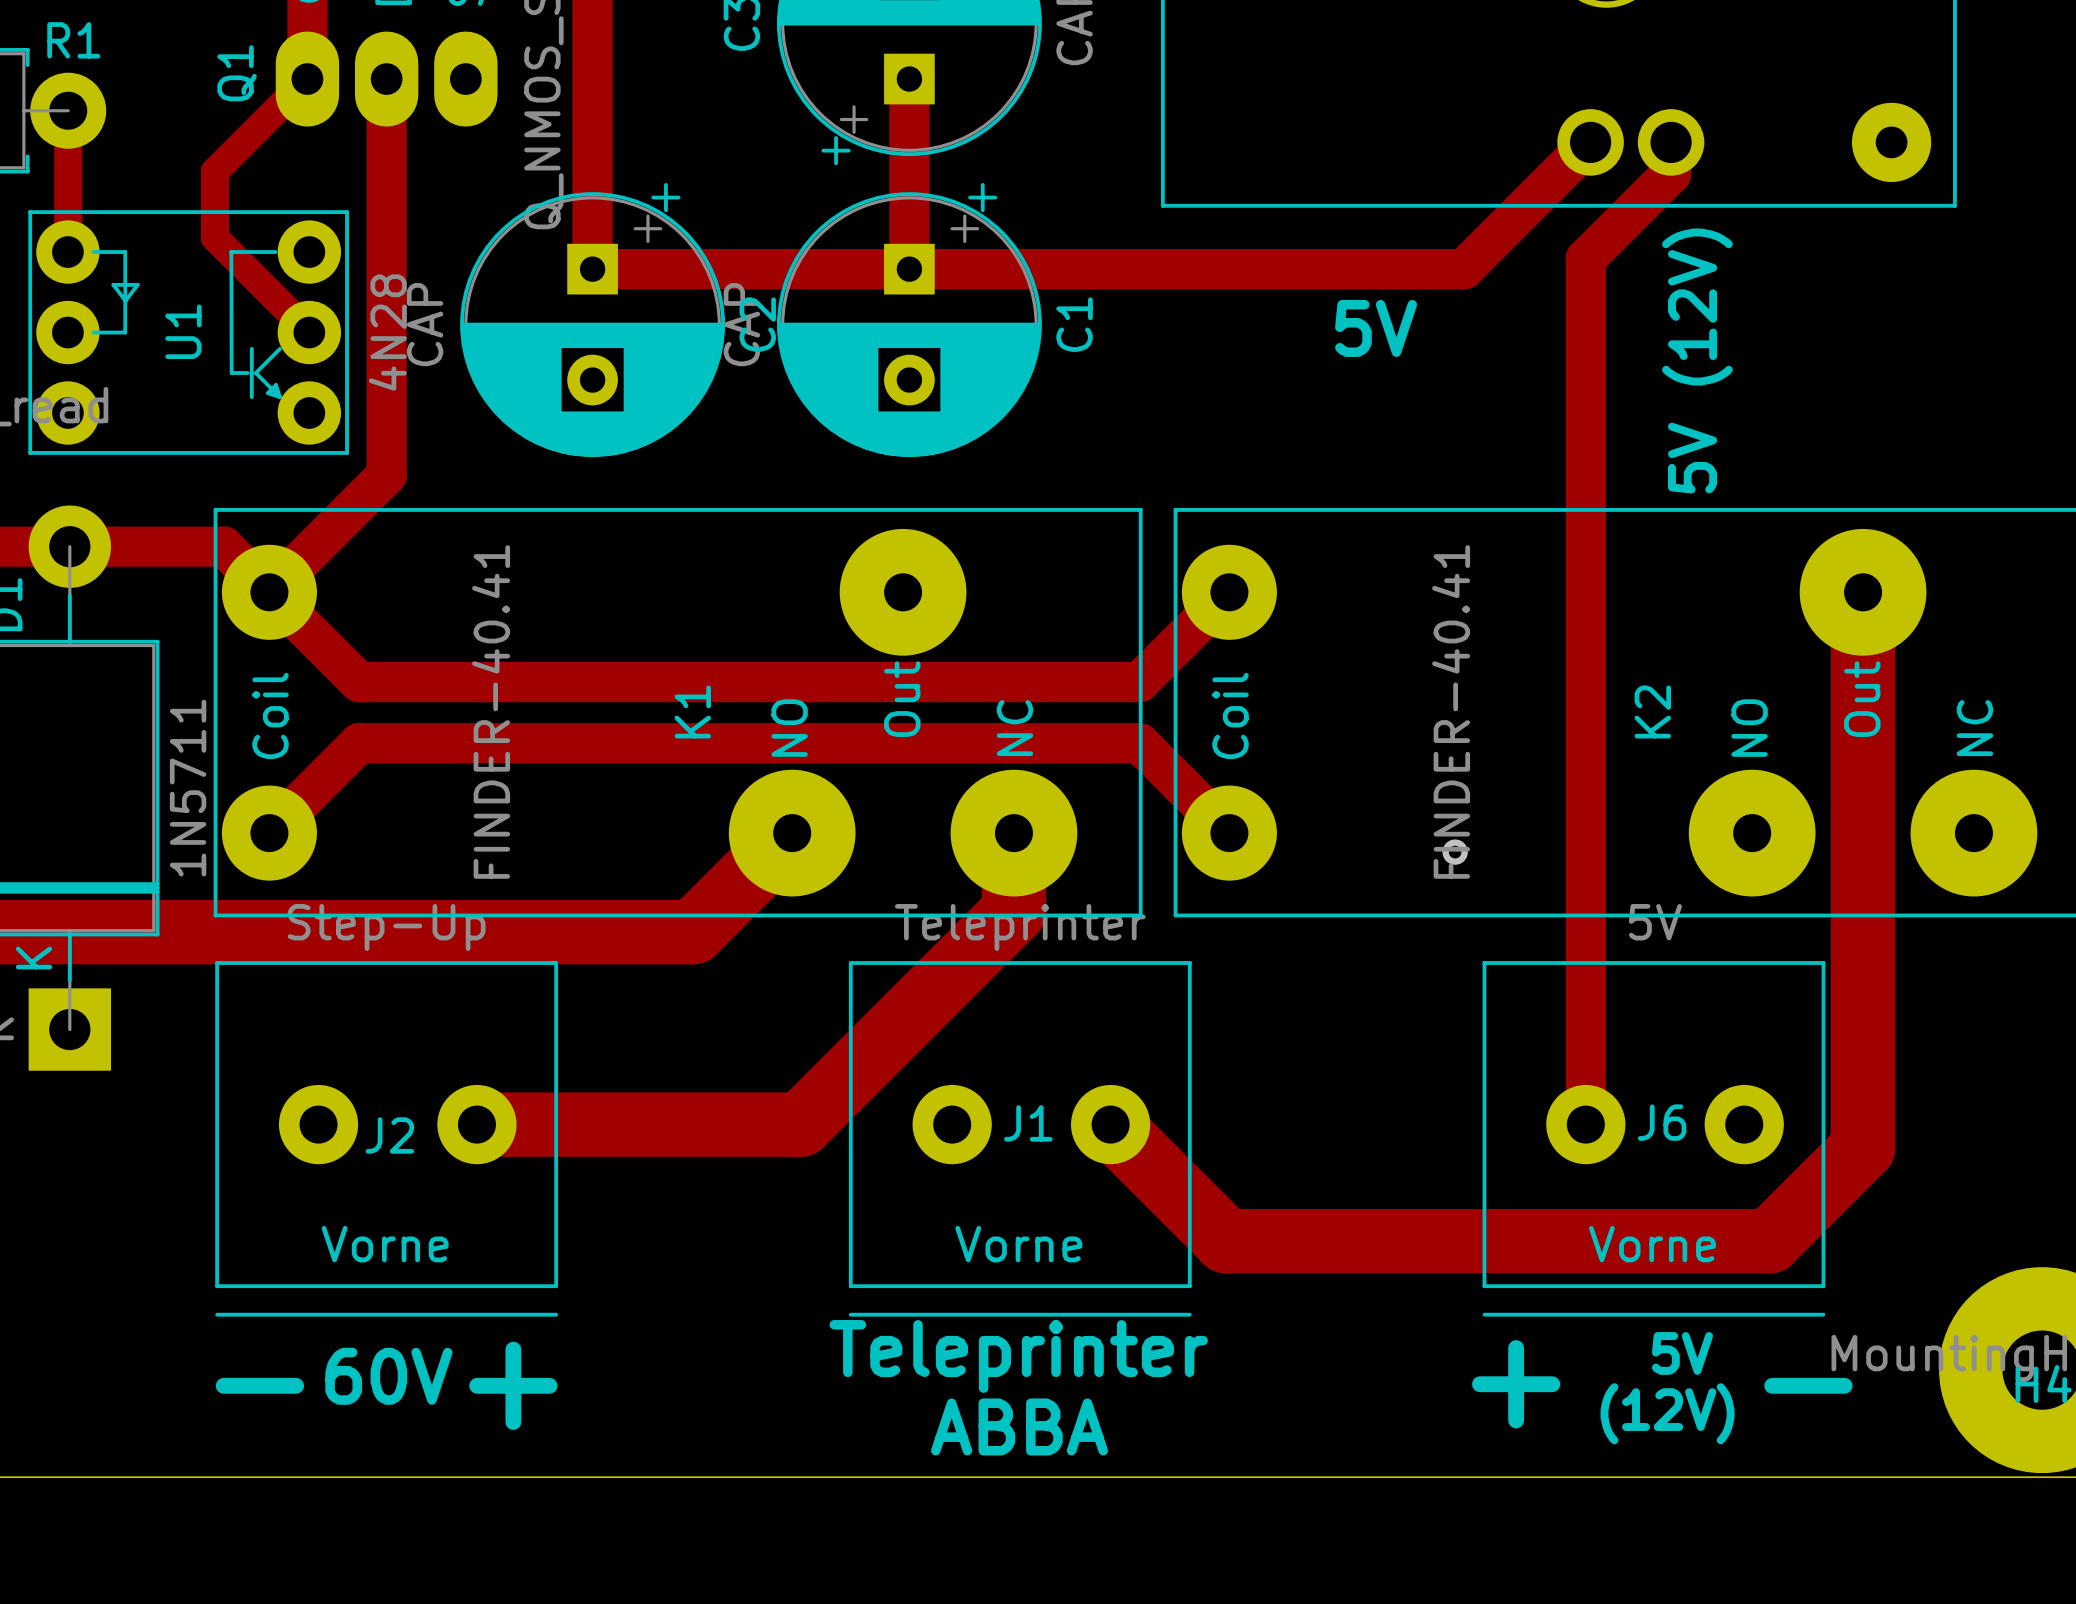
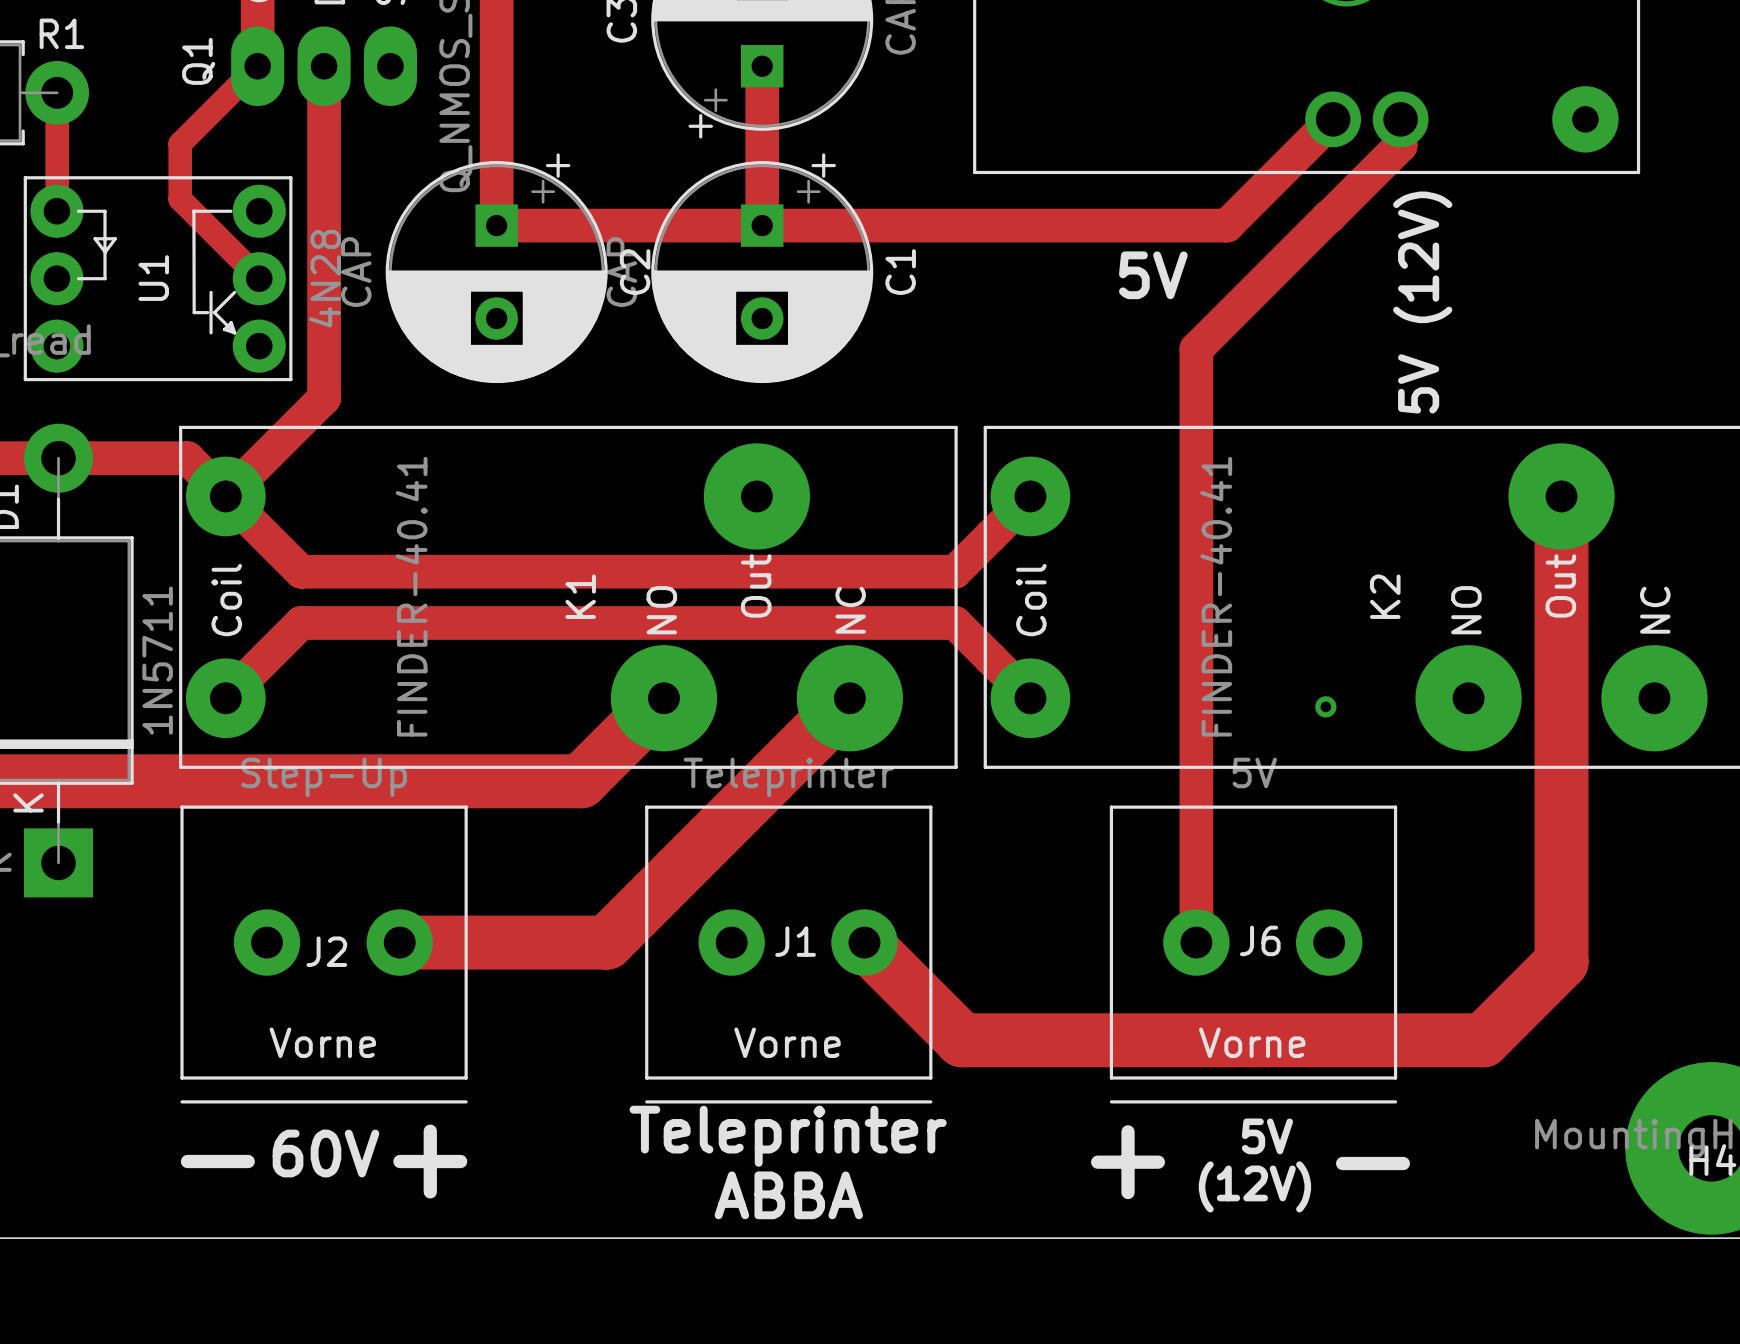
track: (1585, 258) (1585, 1124) -> (1329, 216) (1196, 349) (1196, 942)
track: (1013, 834) (1013, 911) (800, 1124) (724, 1124) -> (849, 699) (606, 942)
via position: (1455, 852) -> (1325, 706)
track: (1110, 1124) (1226, 1241) -> (864, 942) (962, 1040) (1027, 1040)
J1 position: (1020, 1138) -> (788, 954)
J6 position: (1653, 1138) -> (1253, 954)
text position: 5V (1682, 1353) -> 5V (1267, 1136)
text position: Teleprinter (1018, 1356) -> Teleprinter (788, 1136)
text position: + (1516, 1384) -> + (1128, 1162)
text position: - (1808, 1385) -> - (1372, 1163)
text position: (12V) (1667, 1413) -> (12V) (1254, 1186)
text position: ABBA (1019, 1426) -> ABBA (788, 1195)

